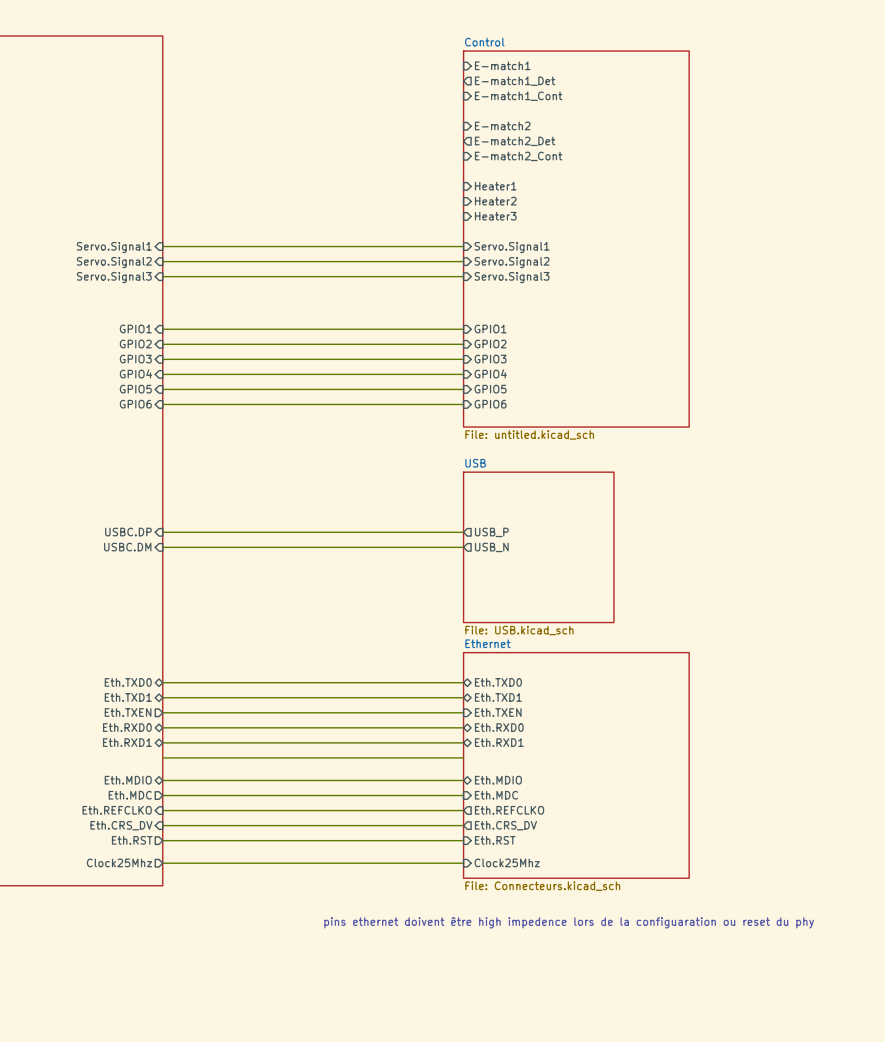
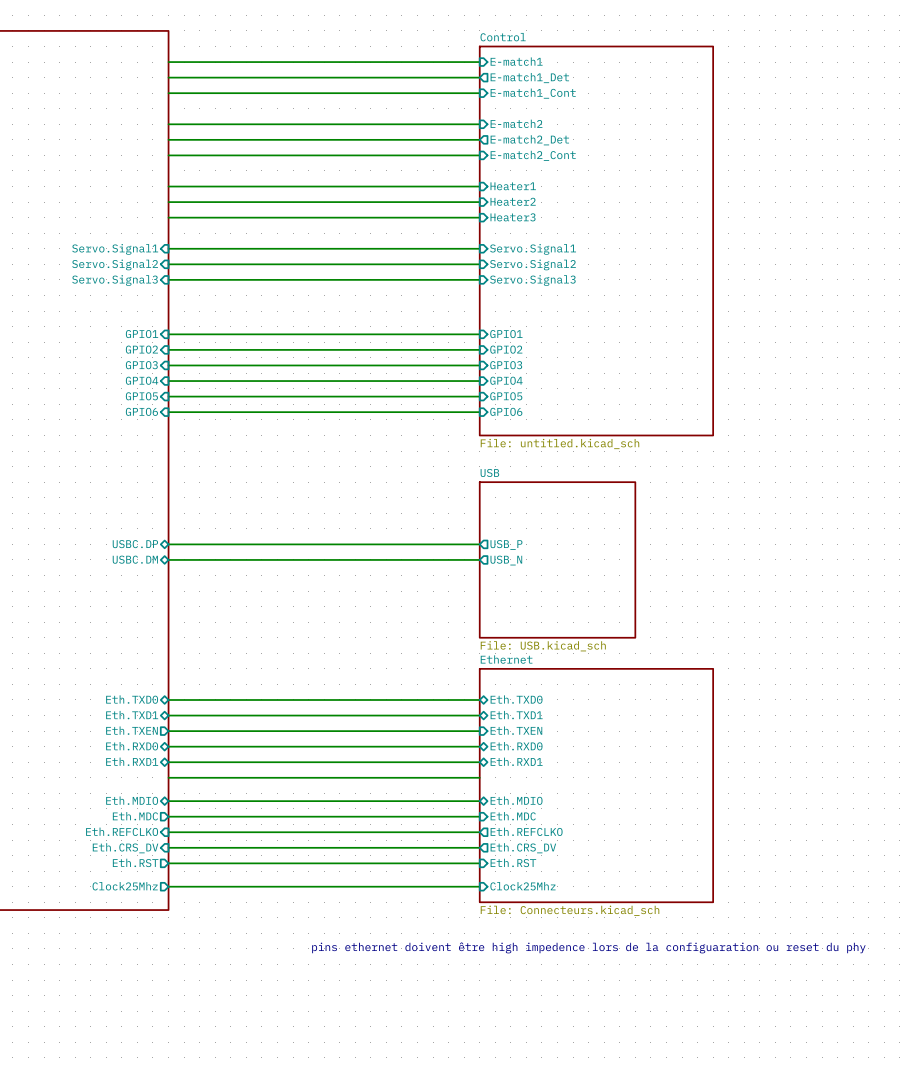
wire: none -> (168, 62) (479, 62)
wire: none -> (168, 77) (479, 77)
wire: none -> (168, 93) (479, 93)
wire: none -> (168, 124) (479, 124)
wire: none -> (168, 139) (479, 139)
wire: none -> (168, 155) (479, 155)
wire: none -> (168, 186) (479, 186)
wire: none -> (168, 202) (479, 202)
wire: none -> (168, 217) (479, 217)
sheet pin shape: input (128, 532) -> bidirectional (135, 544)
sheet pin shape: input (127, 547) -> bidirectional (135, 559)

